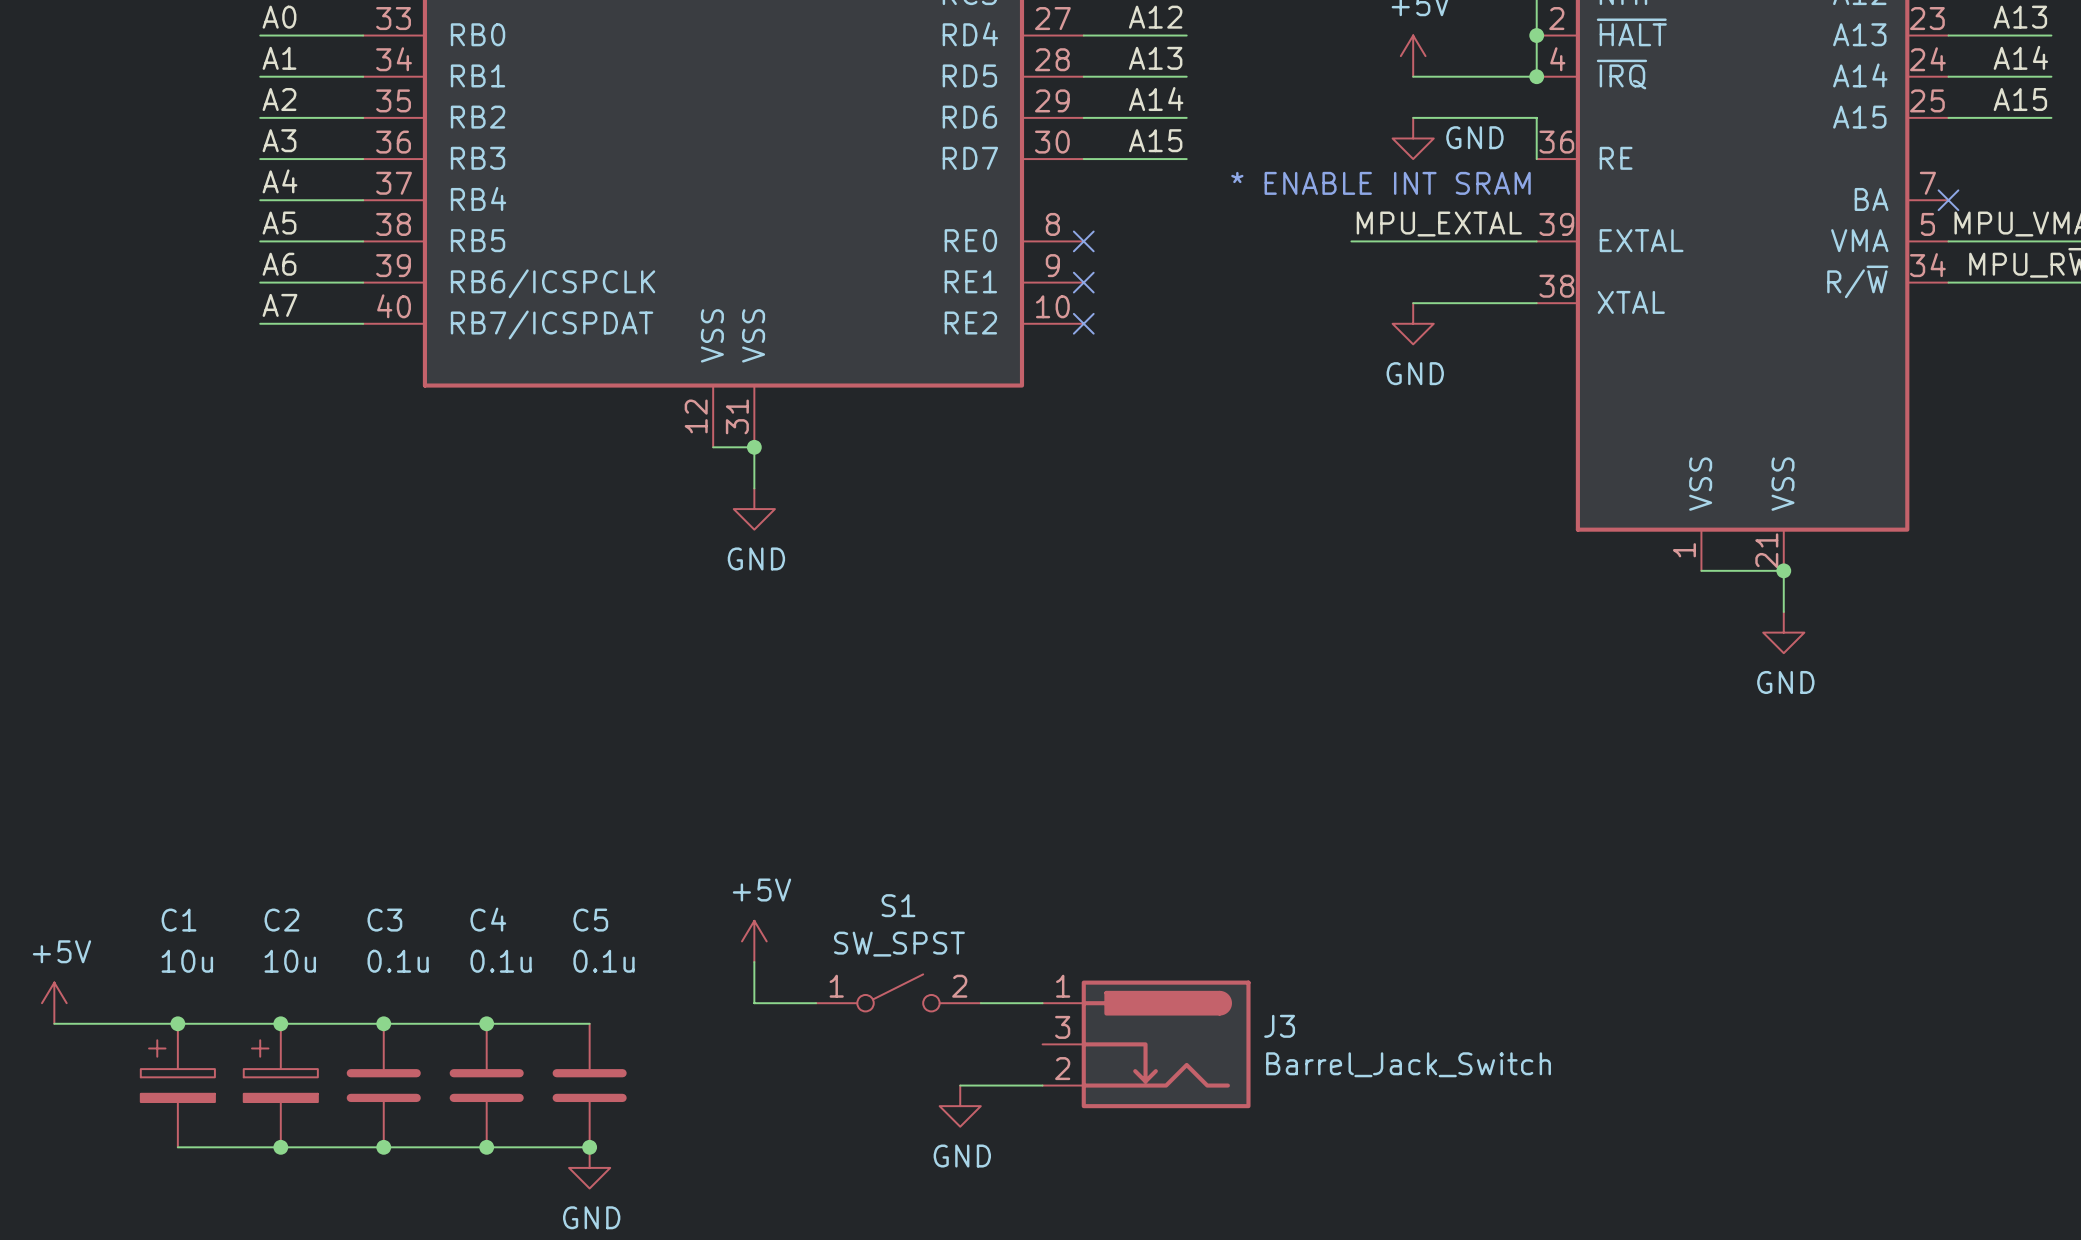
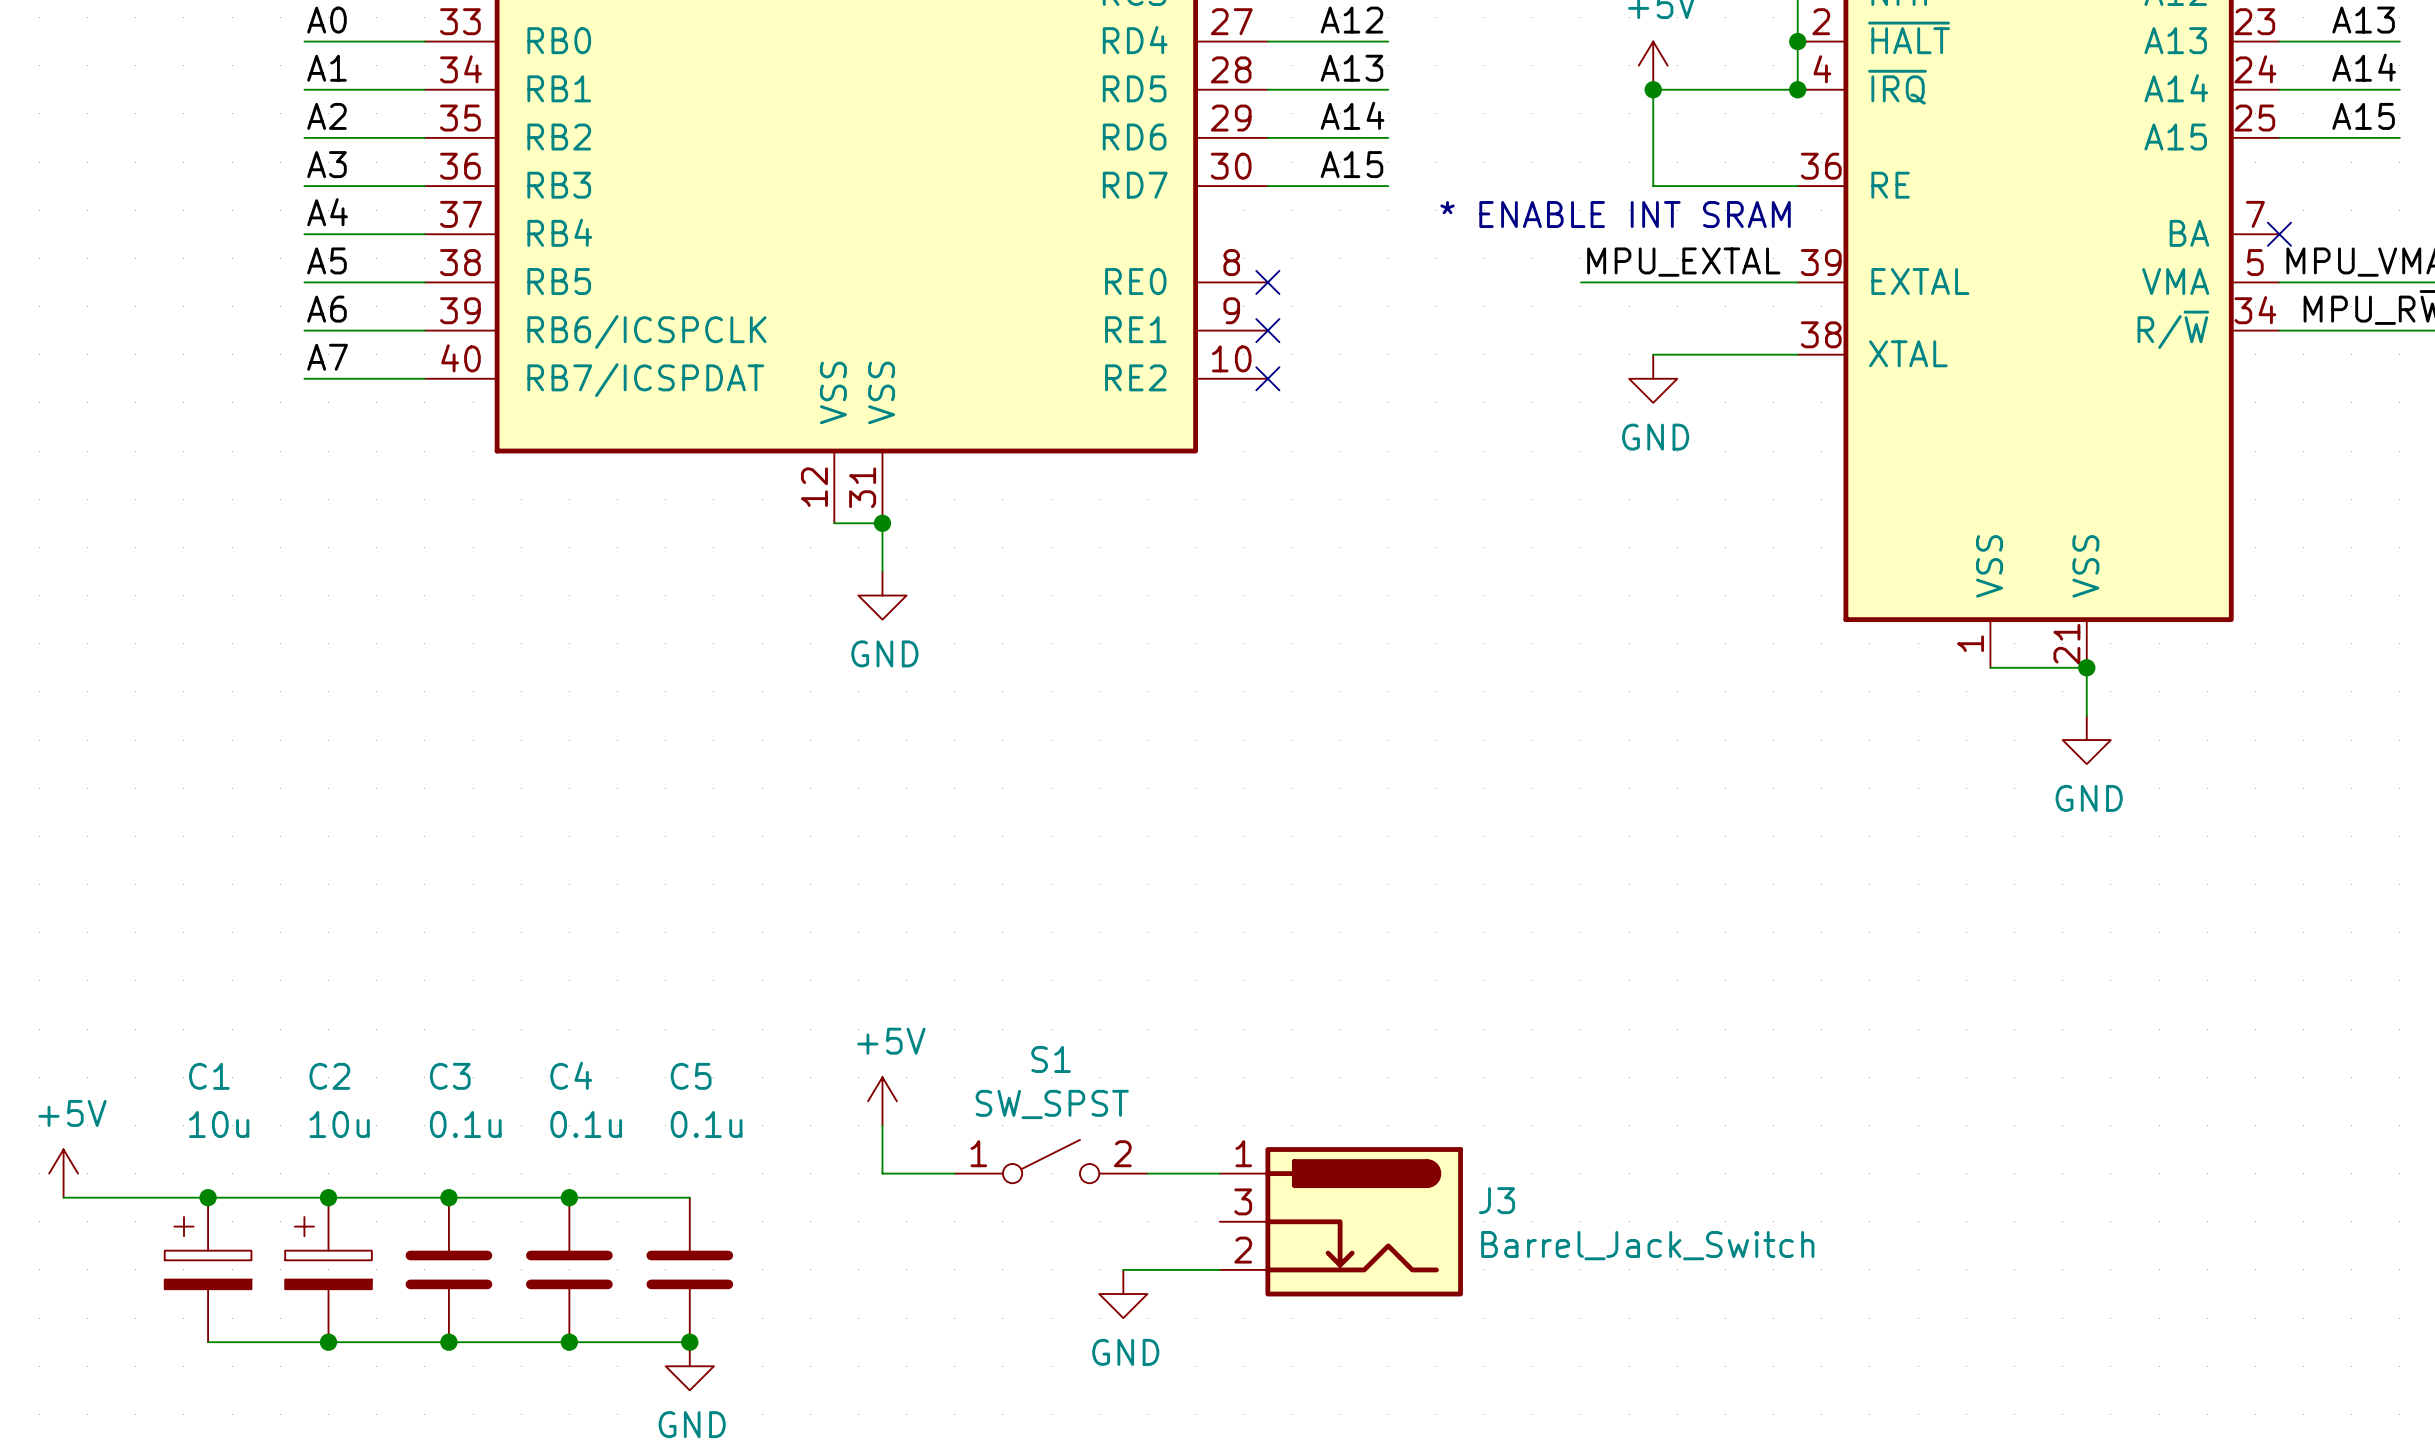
junction: none -> (1653, 89)
wire: (1413, 117) (1536, 117) (1536, 159) -> (1653, 89) (1653, 186) (1797, 186)
power symbol: GND (1413, 138) -> none

